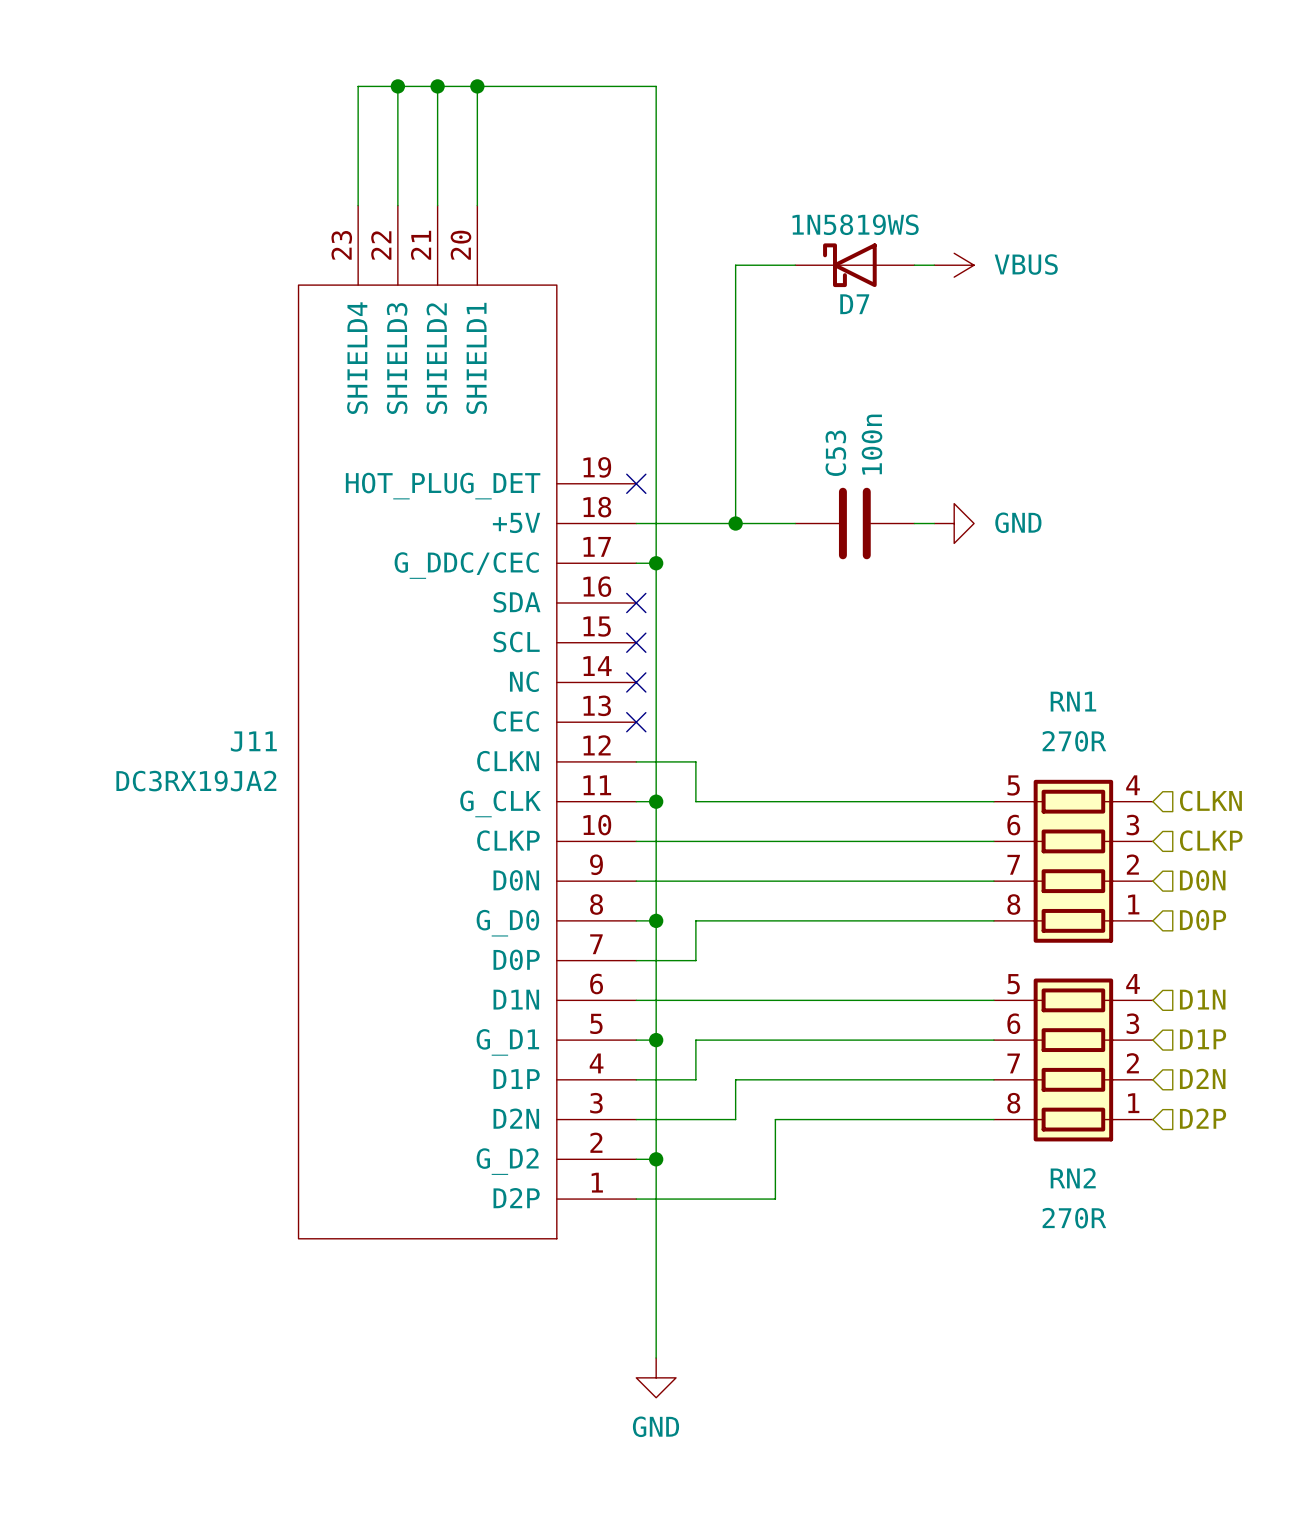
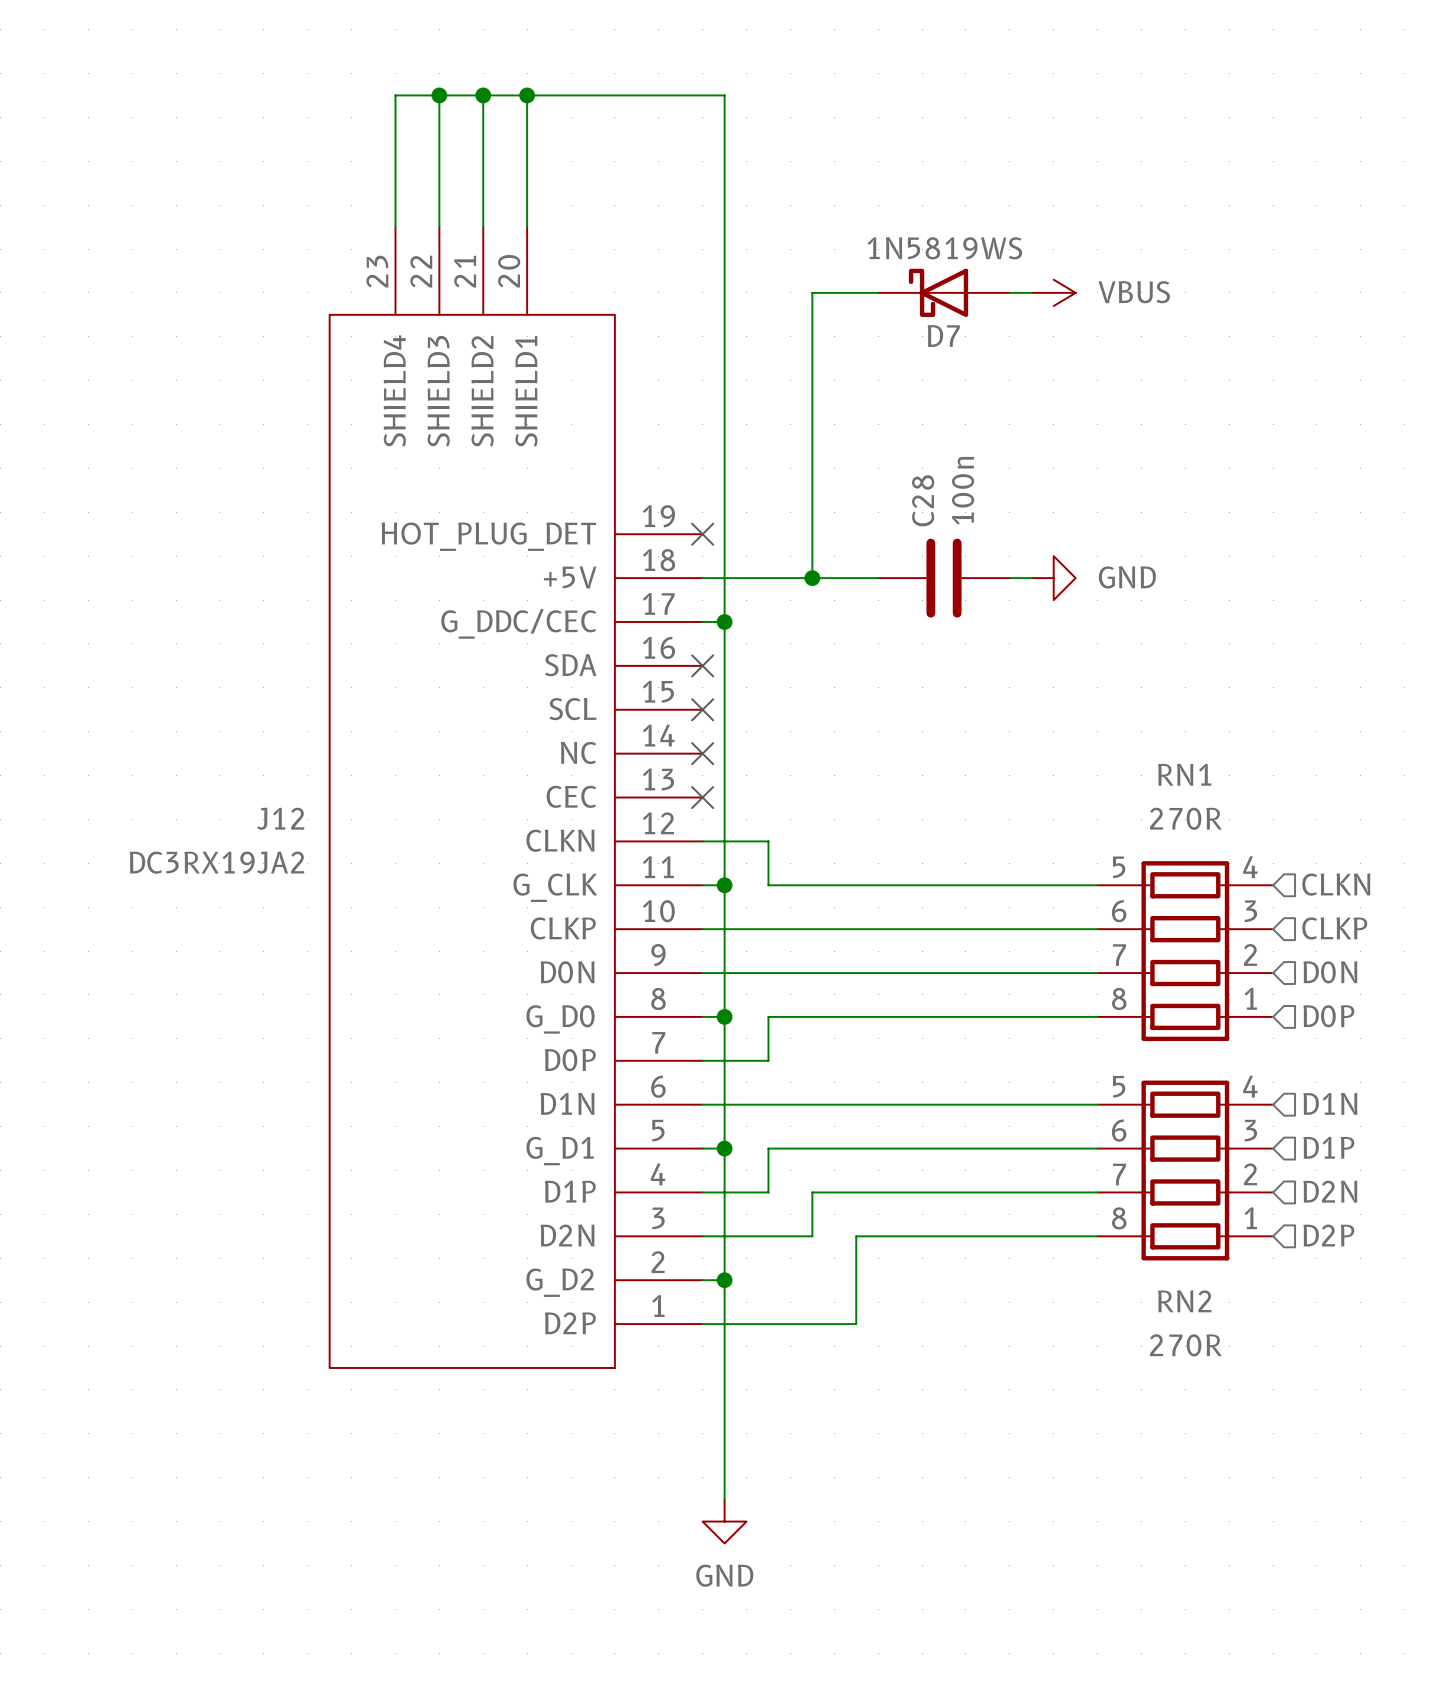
C53 name: C53 (835, 453) -> C28 (923, 500)
J11 name: J11 (253, 741) -> J12 (280, 818)

